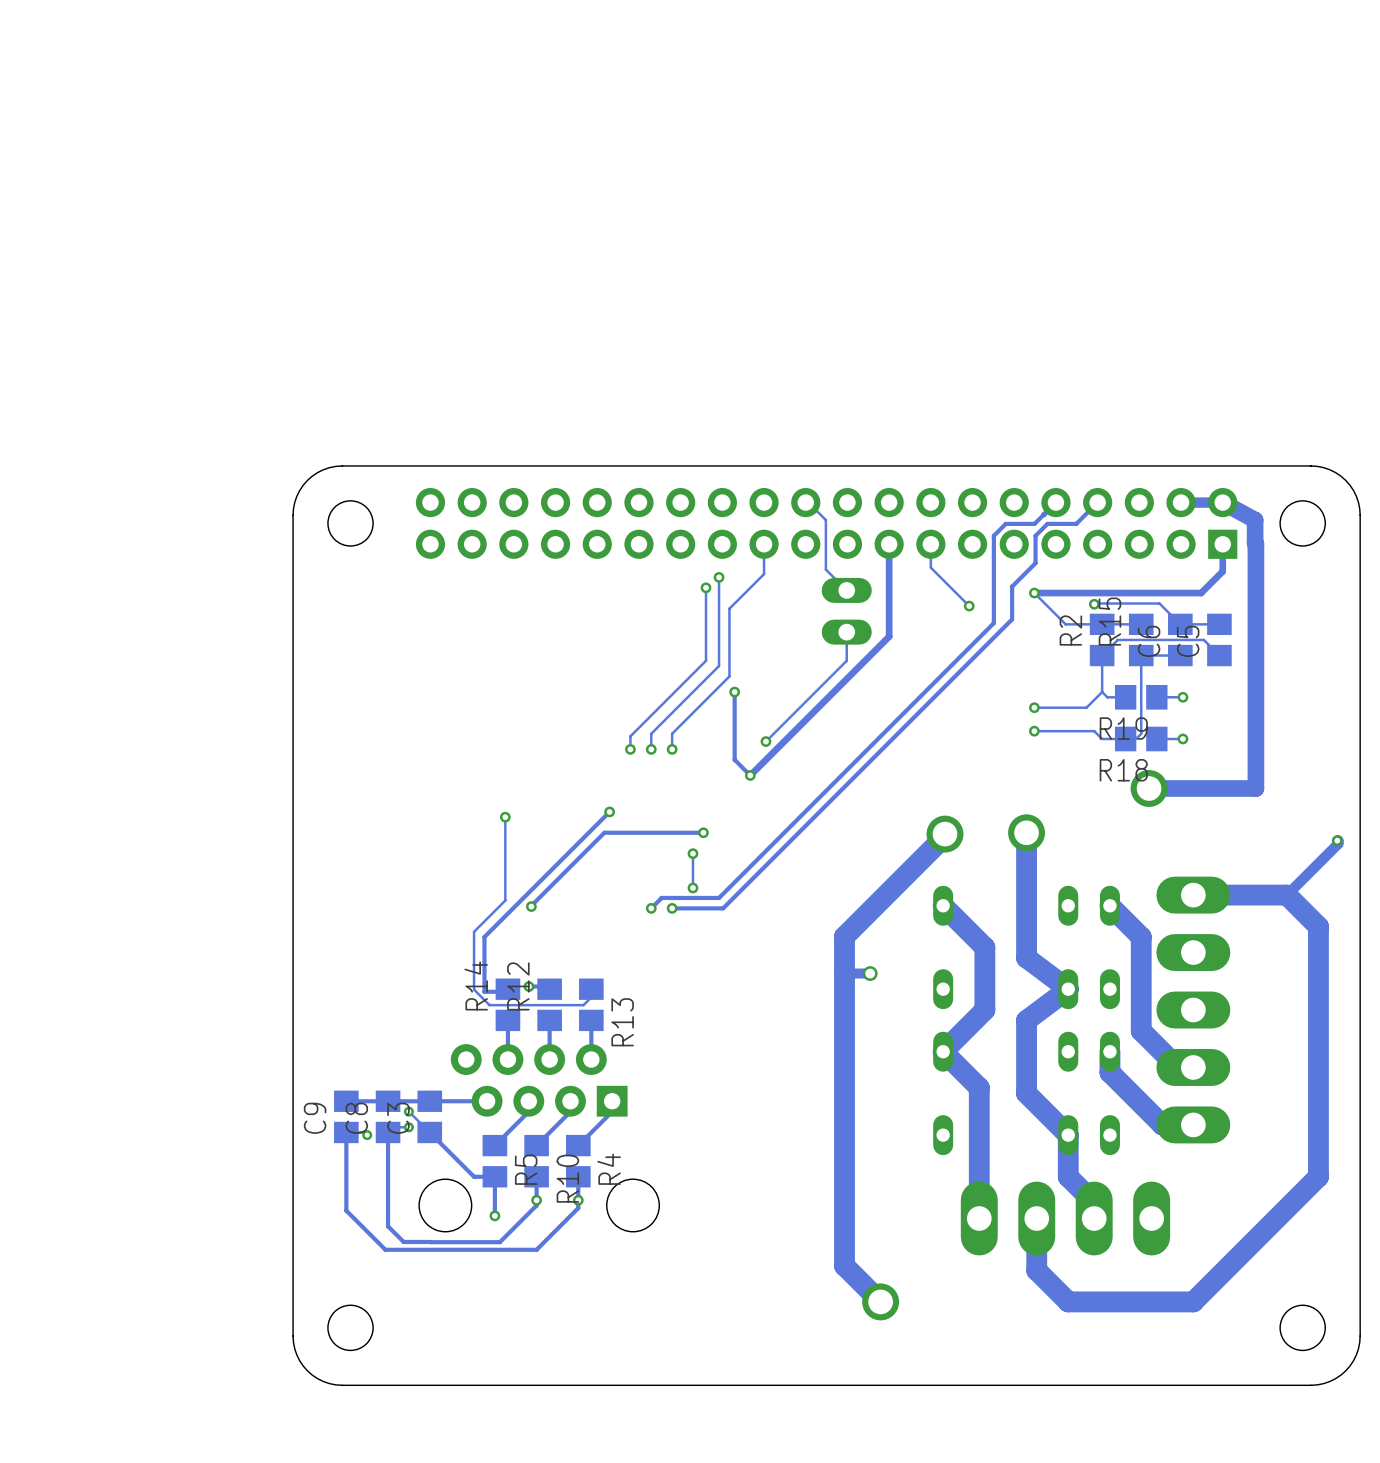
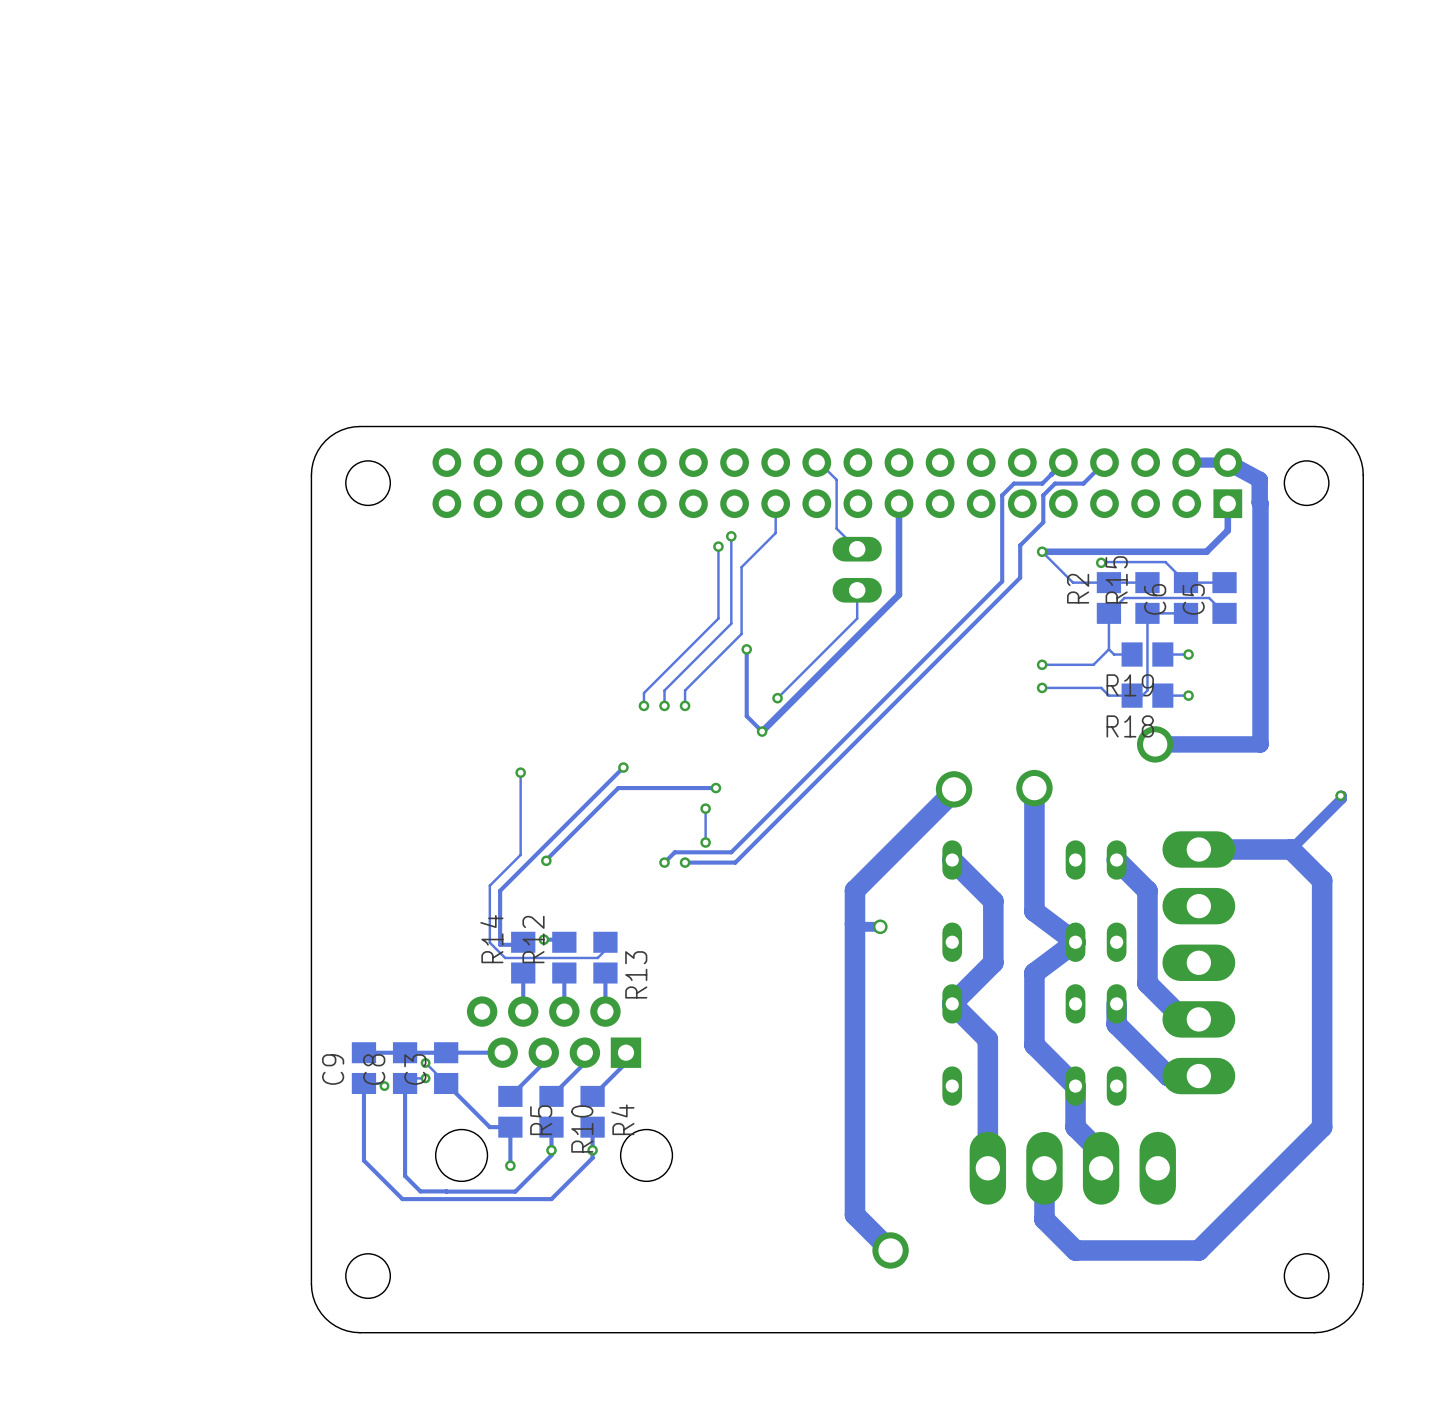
track: (930, 544) (930, 567) (969, 606) -> none
via: (969, 606) -> none

